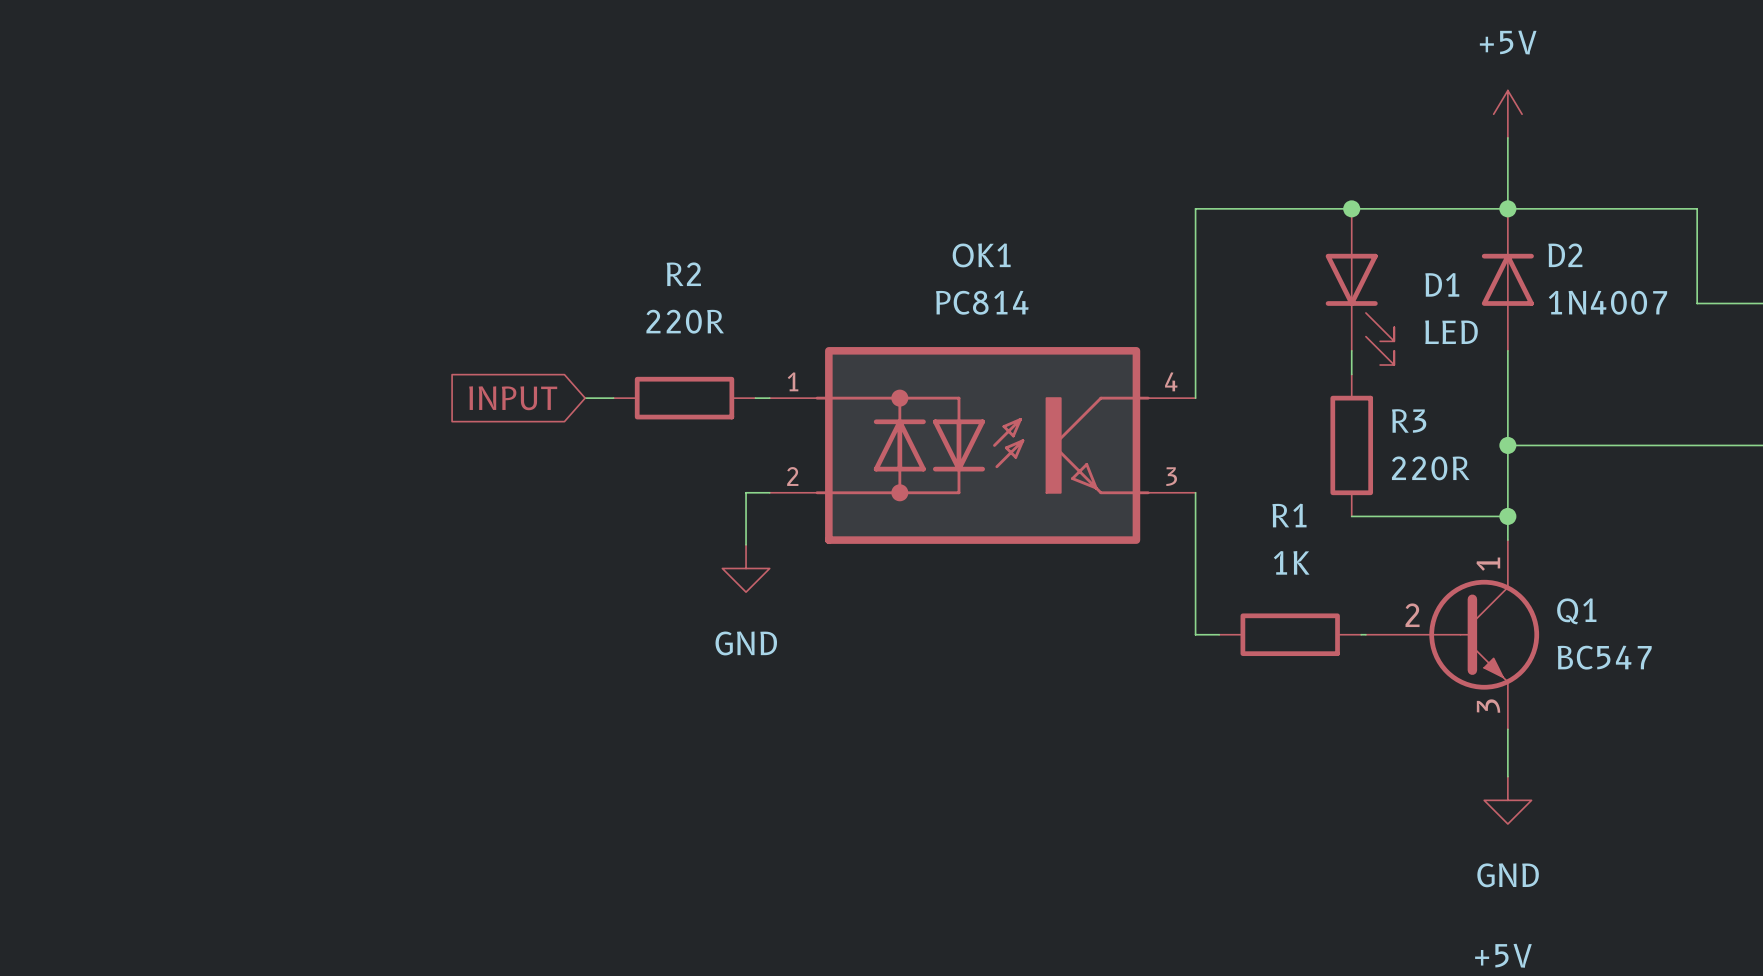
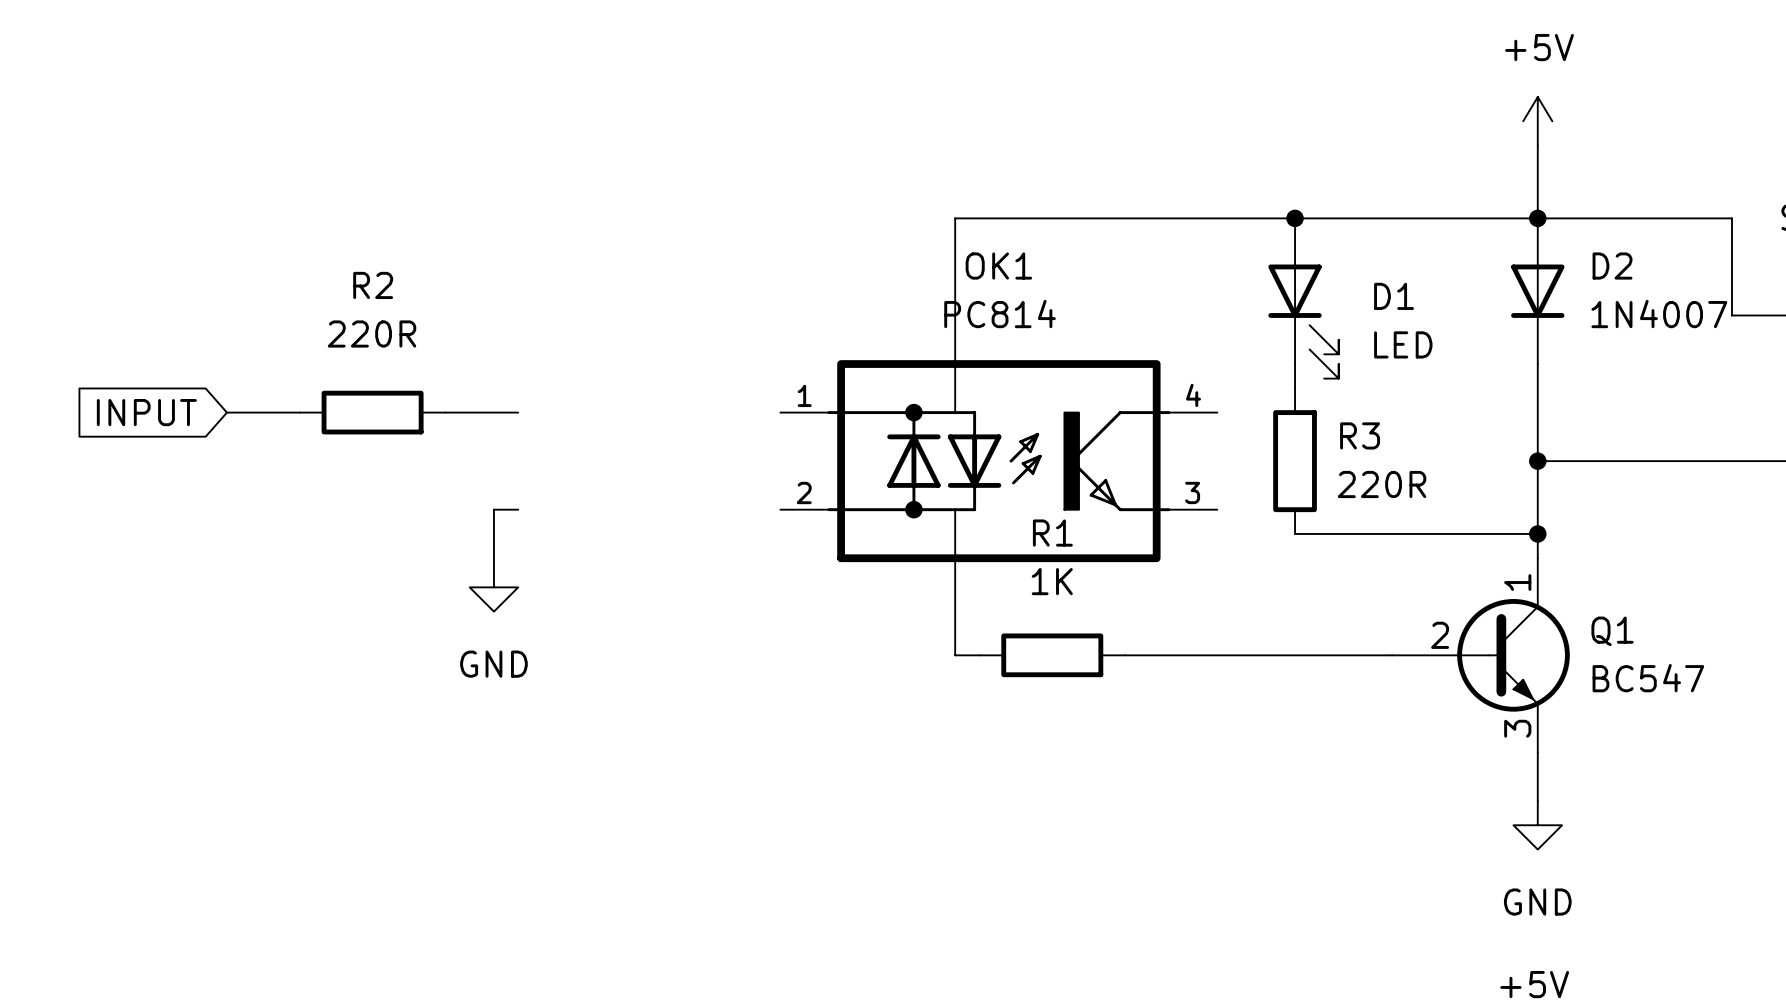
wire: (1195, 208) (1195, 398) -> (1217, 218) (955, 218) (955, 412)
junction position: (1351, 208) -> (1295, 218)
D2 rotation: 0° (1507, 279) -> 180° (1537, 291)
D1 position: (1360, 286) -> (1303, 298)
wire: (1351, 350) (1351, 374) -> (1295, 364) (1295, 388)
wire: none -> (226, 412) (299, 412)
wire: none -> (445, 412) (518, 412)
global label position: INPUT (513, 398) -> INPUT (146, 412)
wire: (585, 398) (613, 398) -> none
R2 position: (684, 398) -> (372, 412)
wire: (755, 398) (769, 398) -> none
R3 position: (1351, 445) -> (1295, 461)
wire: (769, 492) (746, 492) (746, 544) -> (518, 509) (493, 509) (493, 563)
wire: none -> (955, 509) (955, 655) (979, 655)
wire: (1195, 492) (1195, 634) -> (1125, 655) (1217, 655)
wire: none -> (1295, 533) (1377, 533)
power symbol position: GND (746, 568) -> GND (493, 587)
wire: none -> (1241, 655) (1387, 655)
R1 position: (1290, 634) -> (1052, 655)

